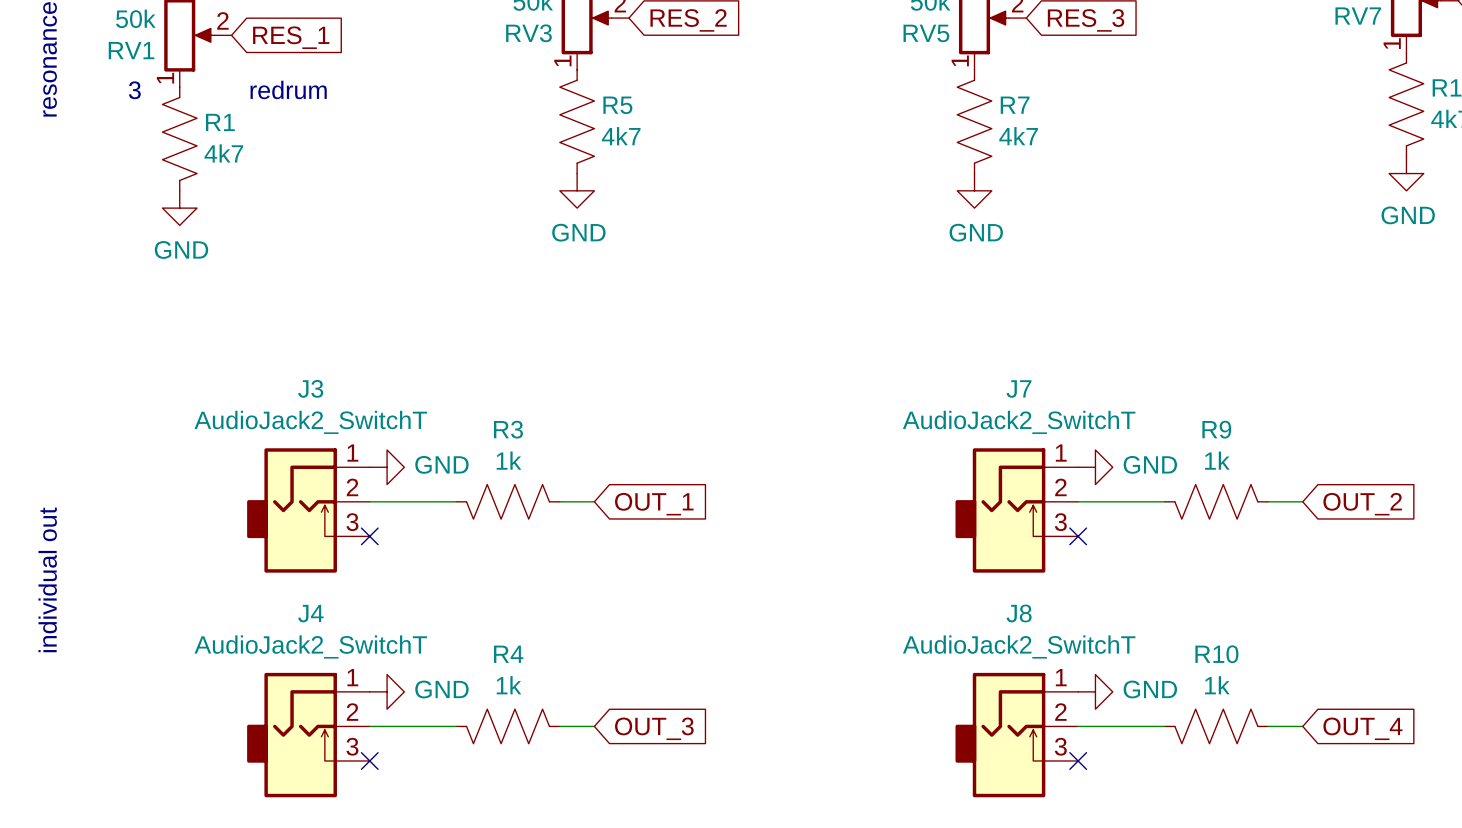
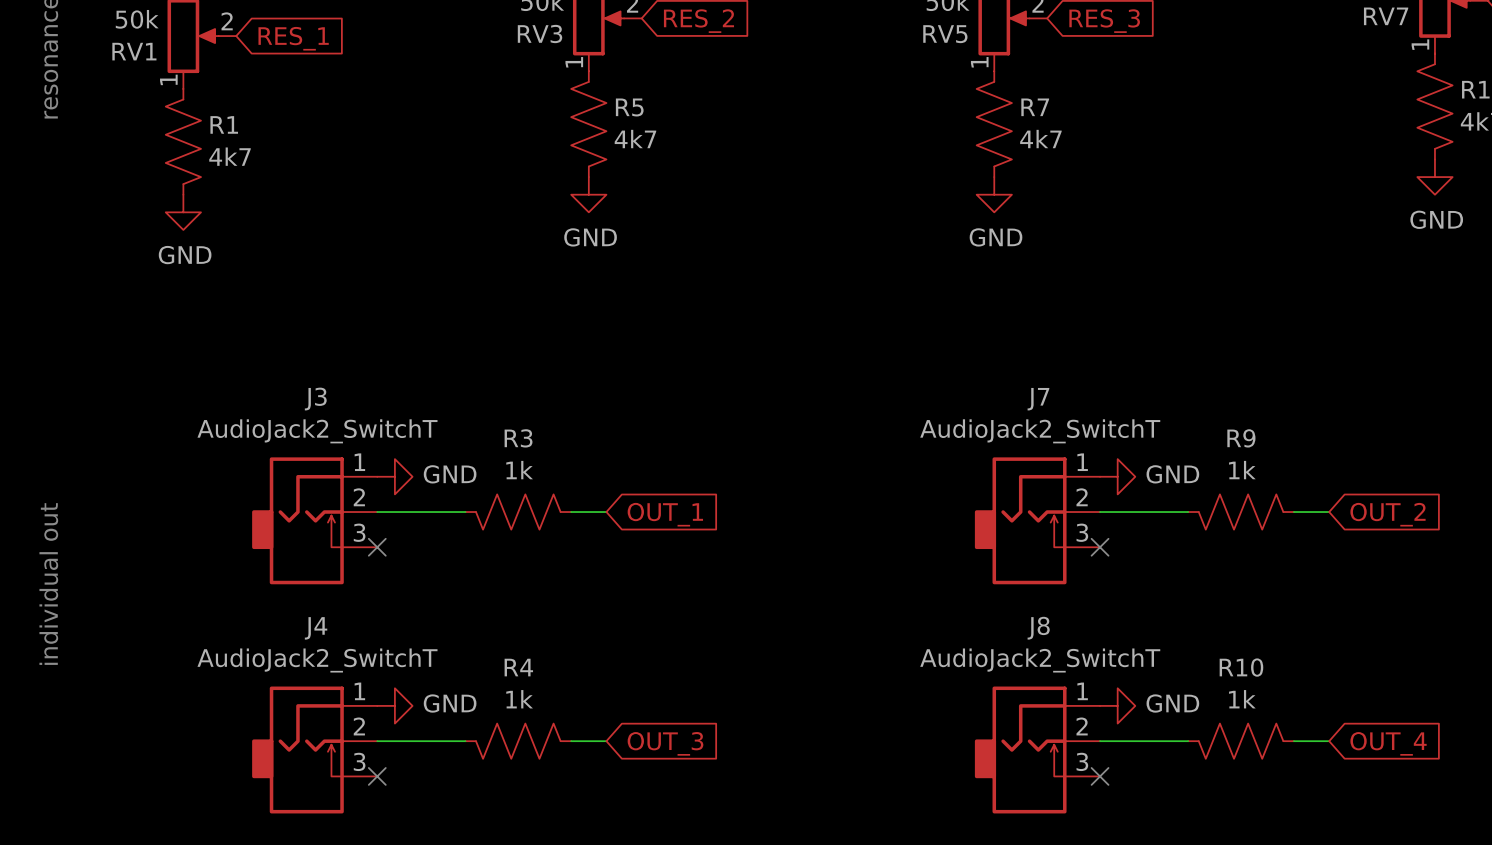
text: redrum (288, 89) -> none
text: 3 (134, 90) -> none

